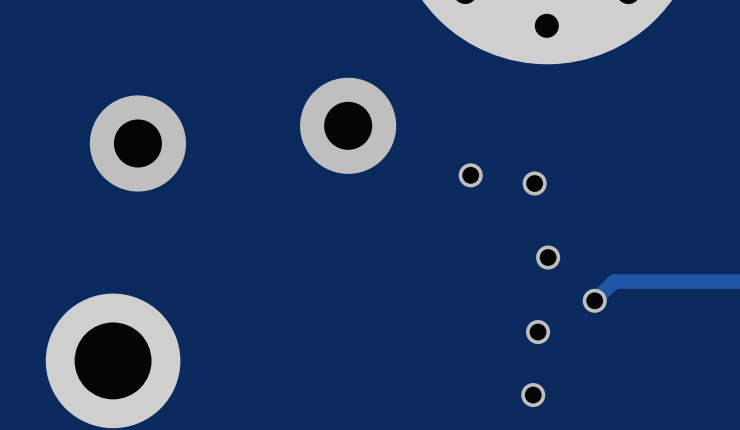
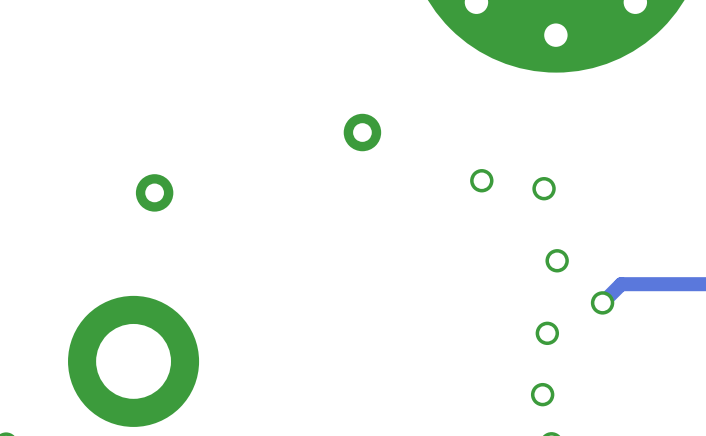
via size: [300, 77, 397, 174] -> [343, 113, 382, 152]
via size: [89, 95, 187, 192] -> [135, 174, 174, 212]

